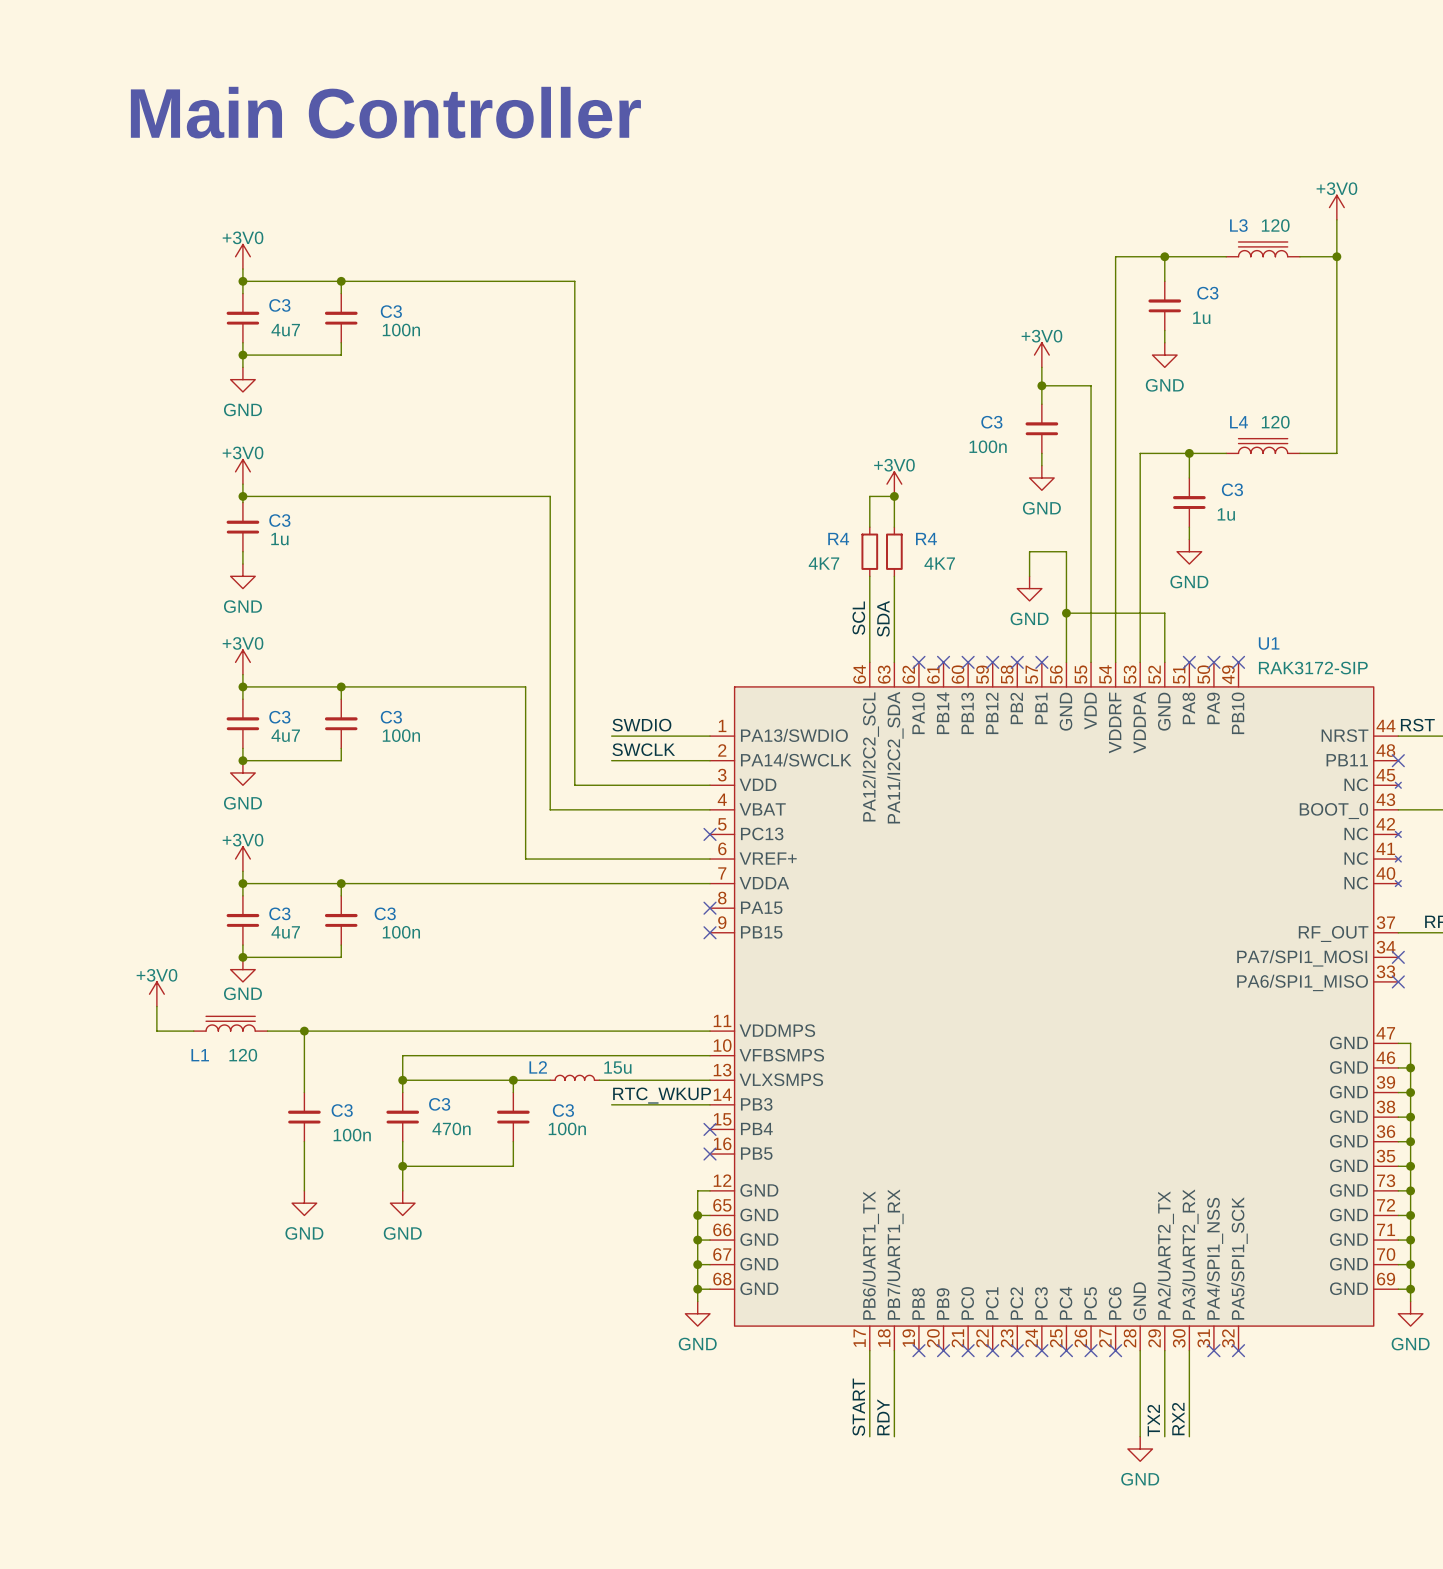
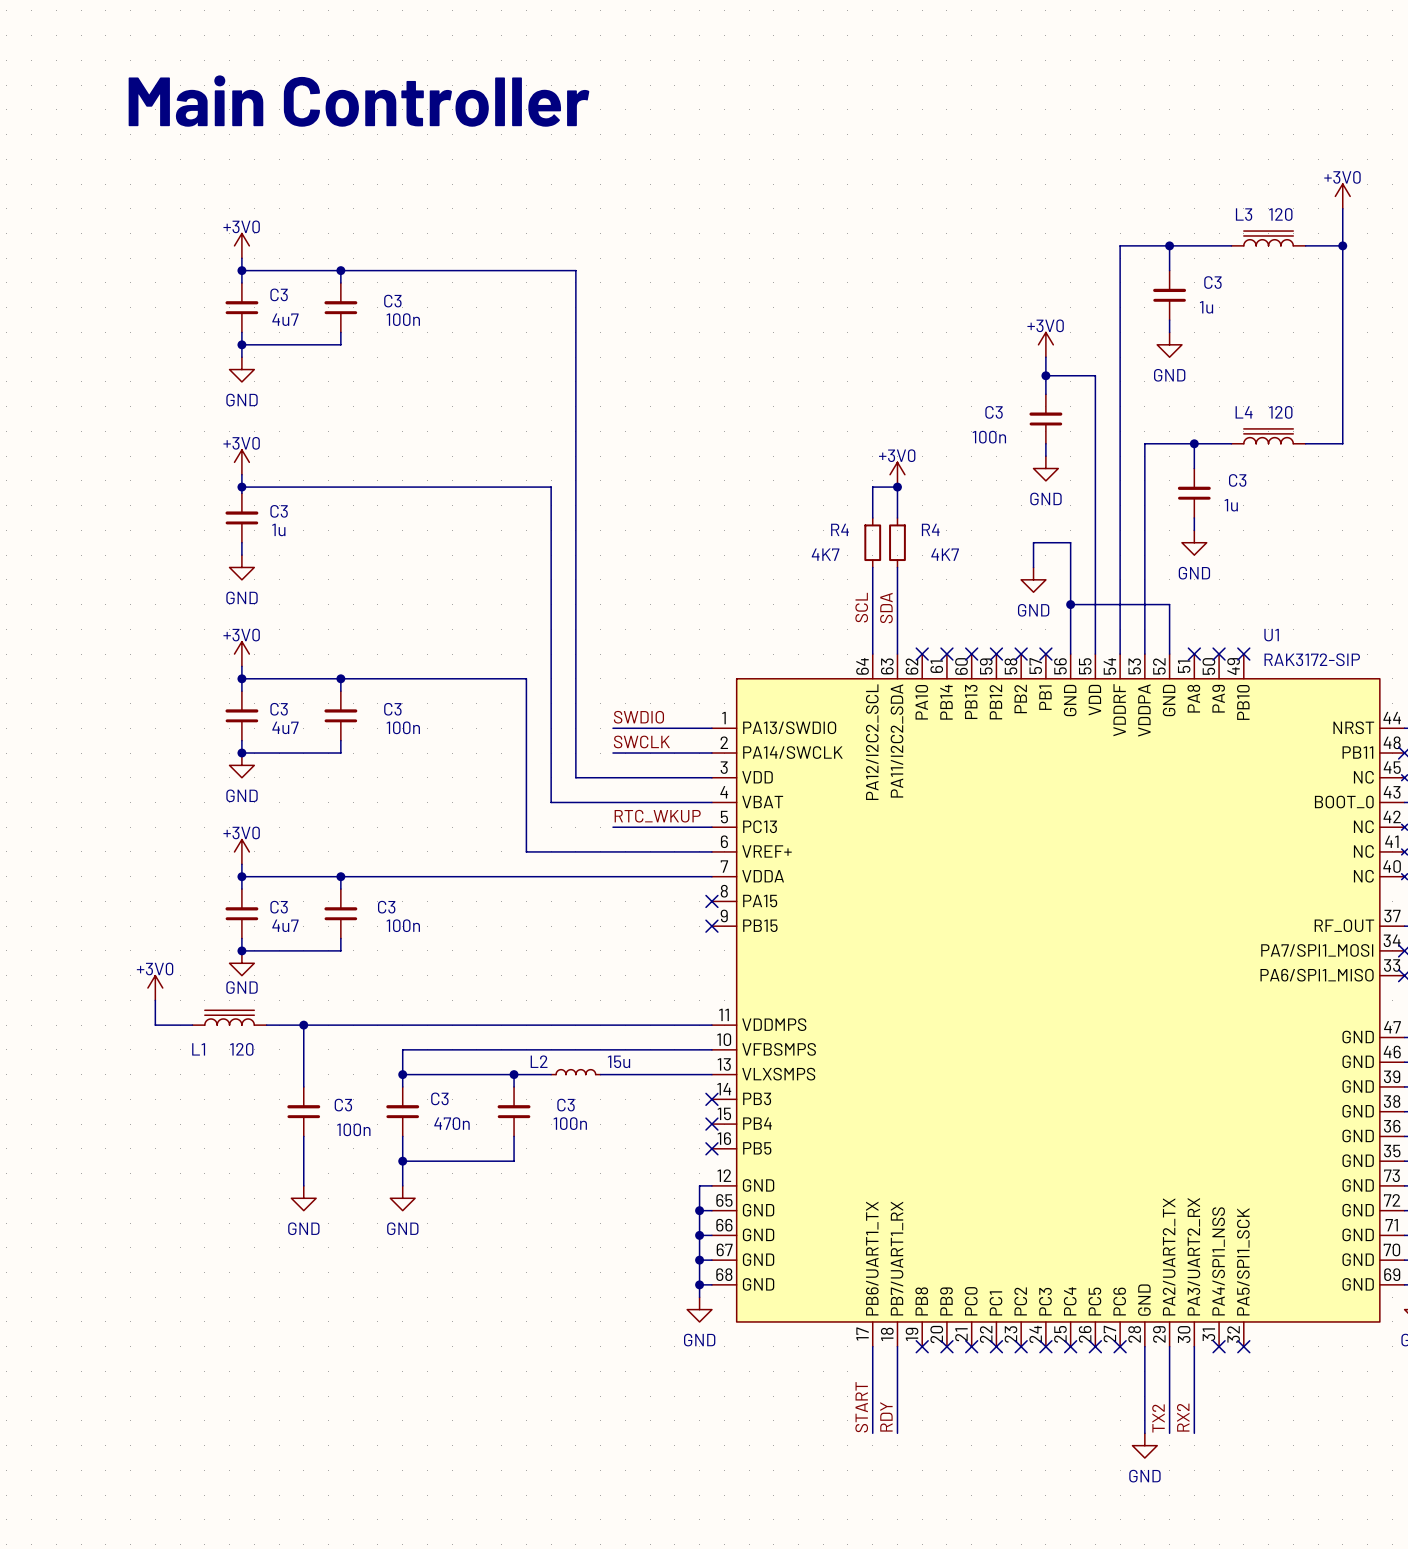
label: none -> RTC_WKUP (657, 816)
wire: none -> (612, 827) (711, 827)
no-connect mark: (710, 834) -> none
label: RTC_WKUP (662, 1095) -> none
wire: (611, 1104) (710, 1104) -> none
no-connect mark: none -> (711, 1099)

